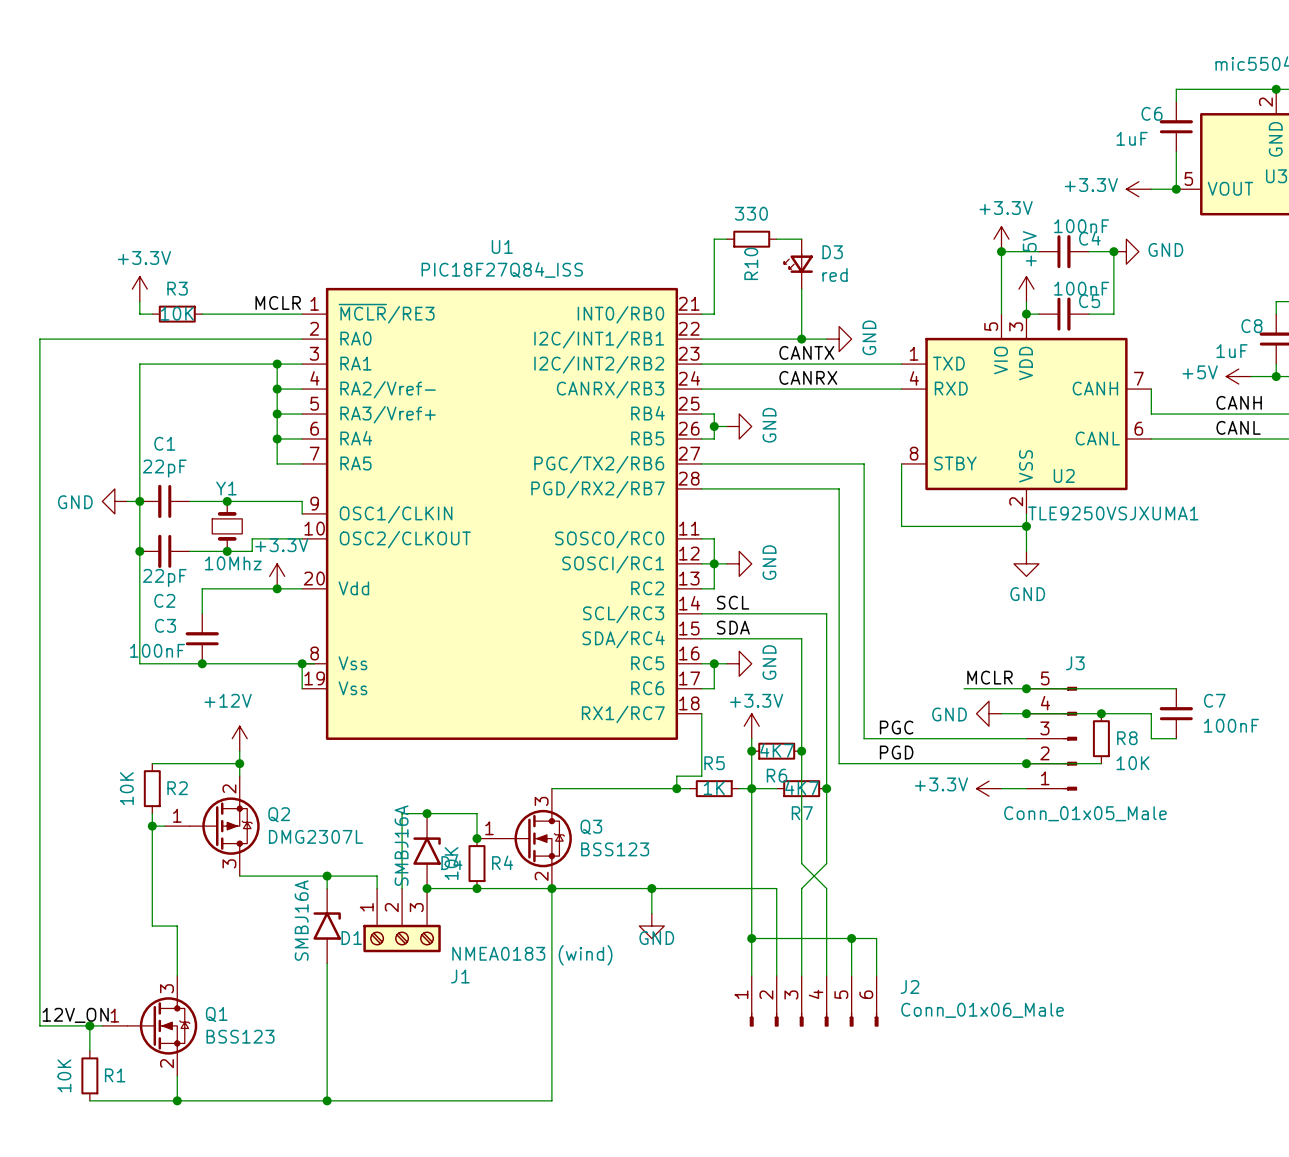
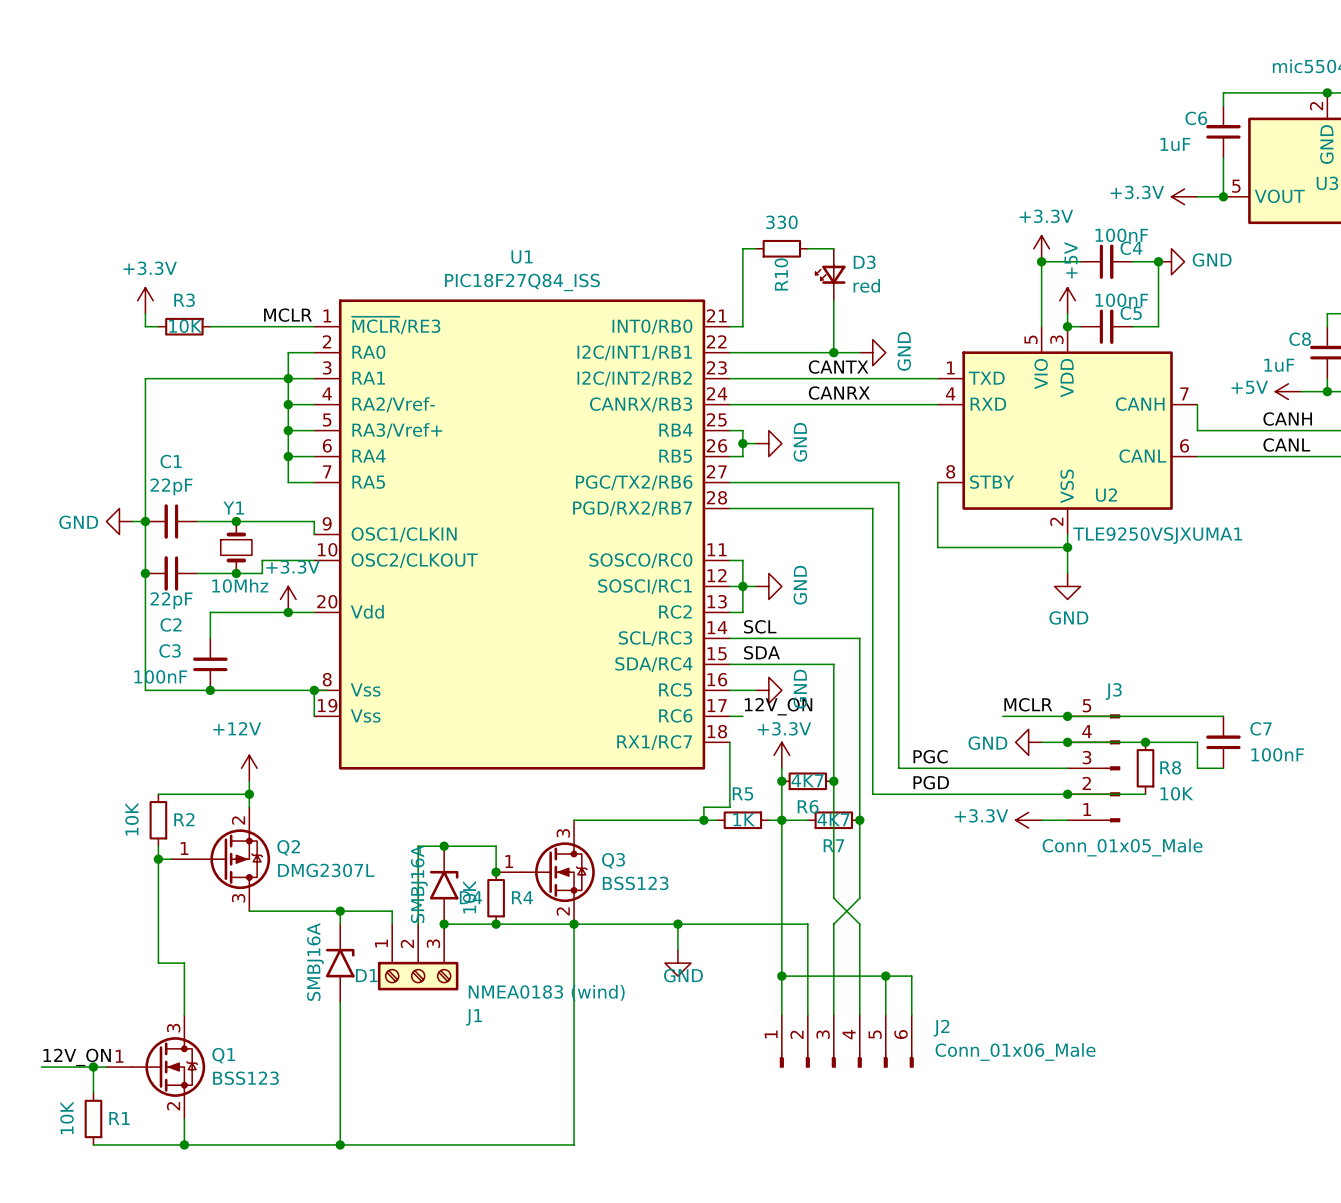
wire: (277, 339) (39, 339) (39, 1025) -> (288, 352) (288, 378)
wire: (714, 663) (714, 688) -> none
junction: (714, 663) -> none
label: none -> 12V_ON (778, 706)

